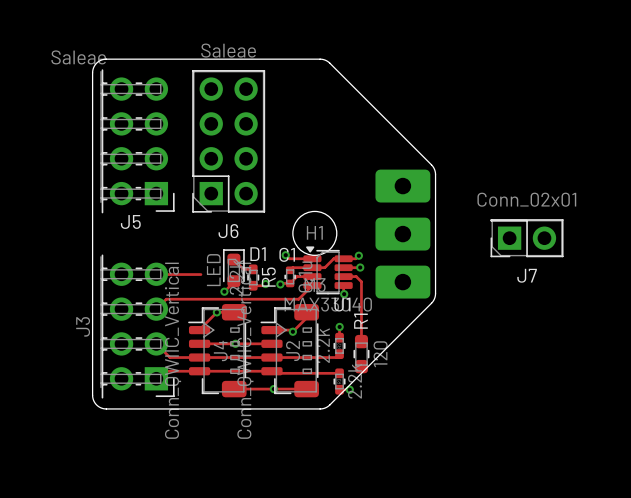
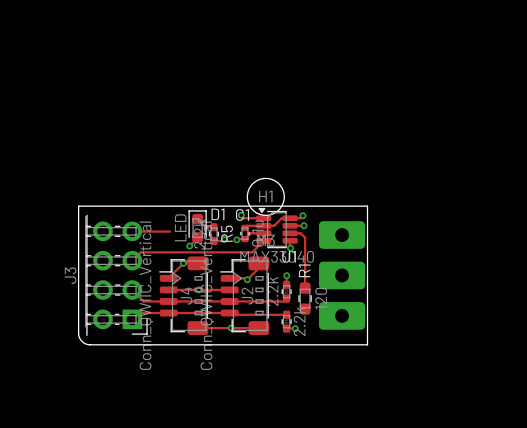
J5: Saleae (137, 141) -> none
J6: Saleae (228, 141) -> none
part position: (402, 234) -> (342, 275)
J7: Conn_02x01 (527, 238) -> none
board edge: (92, 244) (92, 71) (97, 62) (106, 59) (320, 59) (326, 60) (433, 168) (435, 244) -> (78, 206) (367, 206)
board edge: (435, 293) (431, 303) (329, 404) (320, 408) -> (367, 247) (367, 344) (270, 344)

